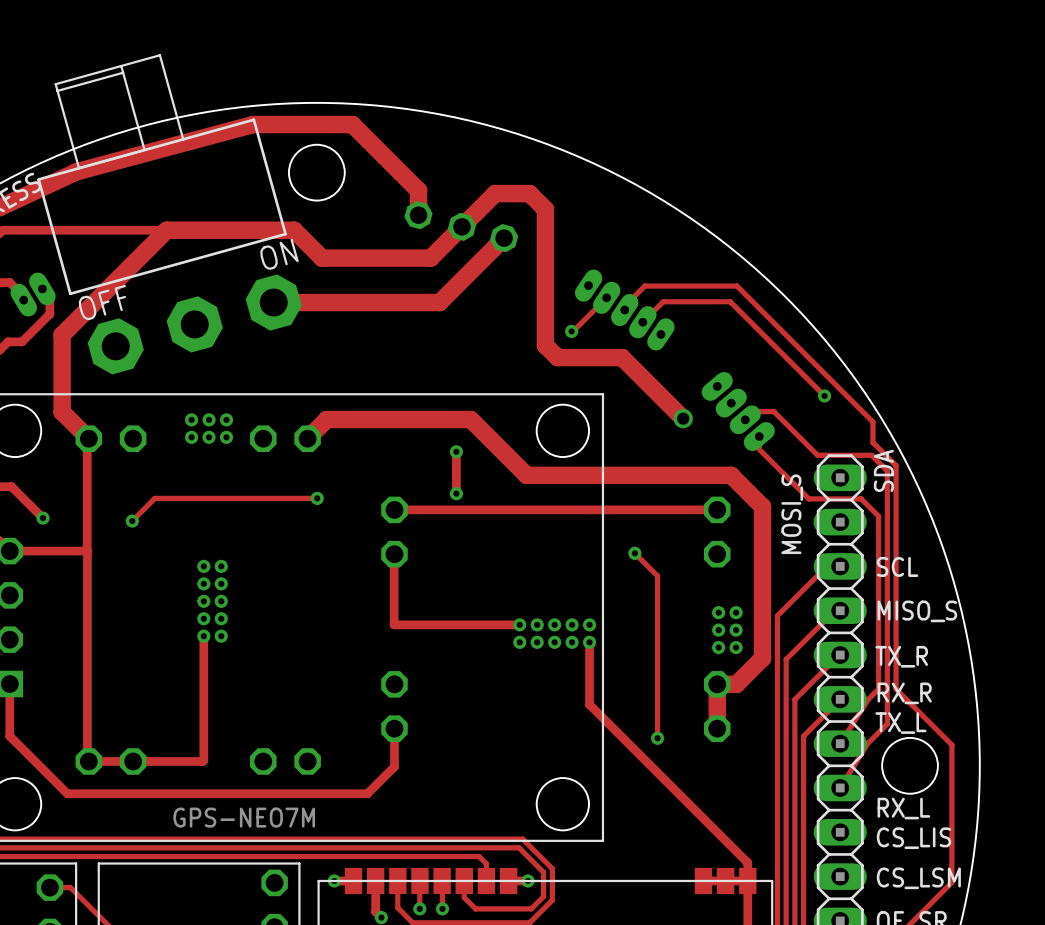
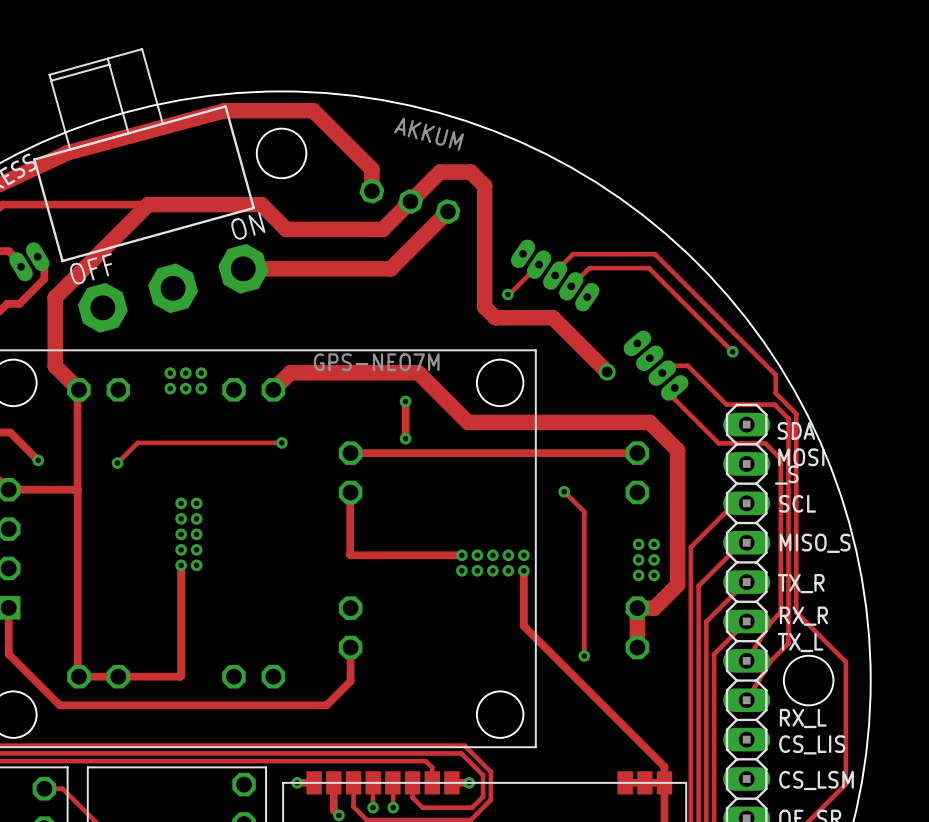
part value: none -> AKKUM (429, 134)
text rotation: 0° (883, 470) -> 90° clockwise (796, 430)
text: MOSI_S (792, 514) -> none
text: none -> MOSI (801, 457)
text: none -> _S (786, 475)
GPS-NEO7M name position: GPS-NEO7M (244, 817) -> GPS-NEO7M (376, 362)

